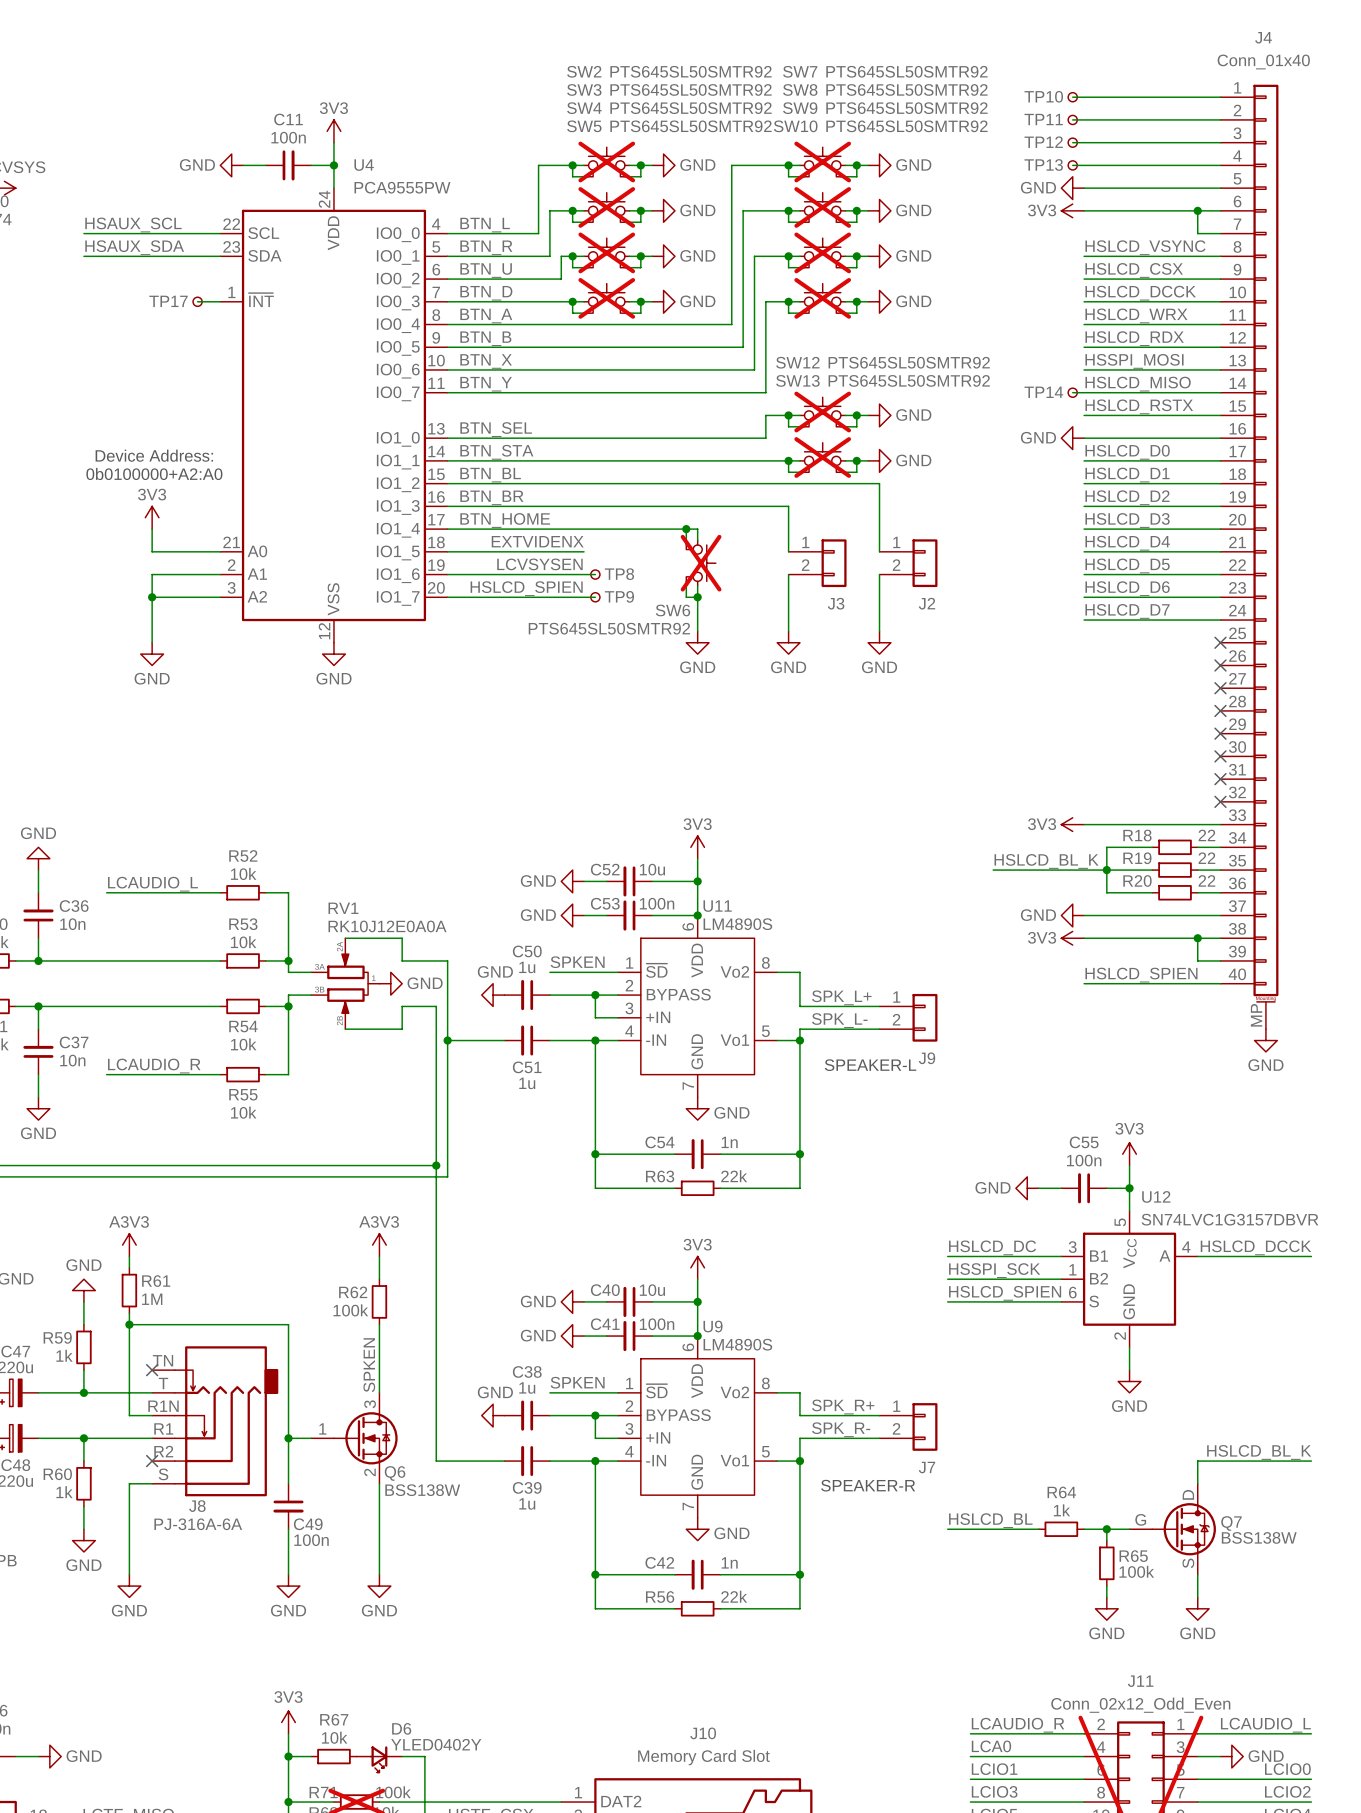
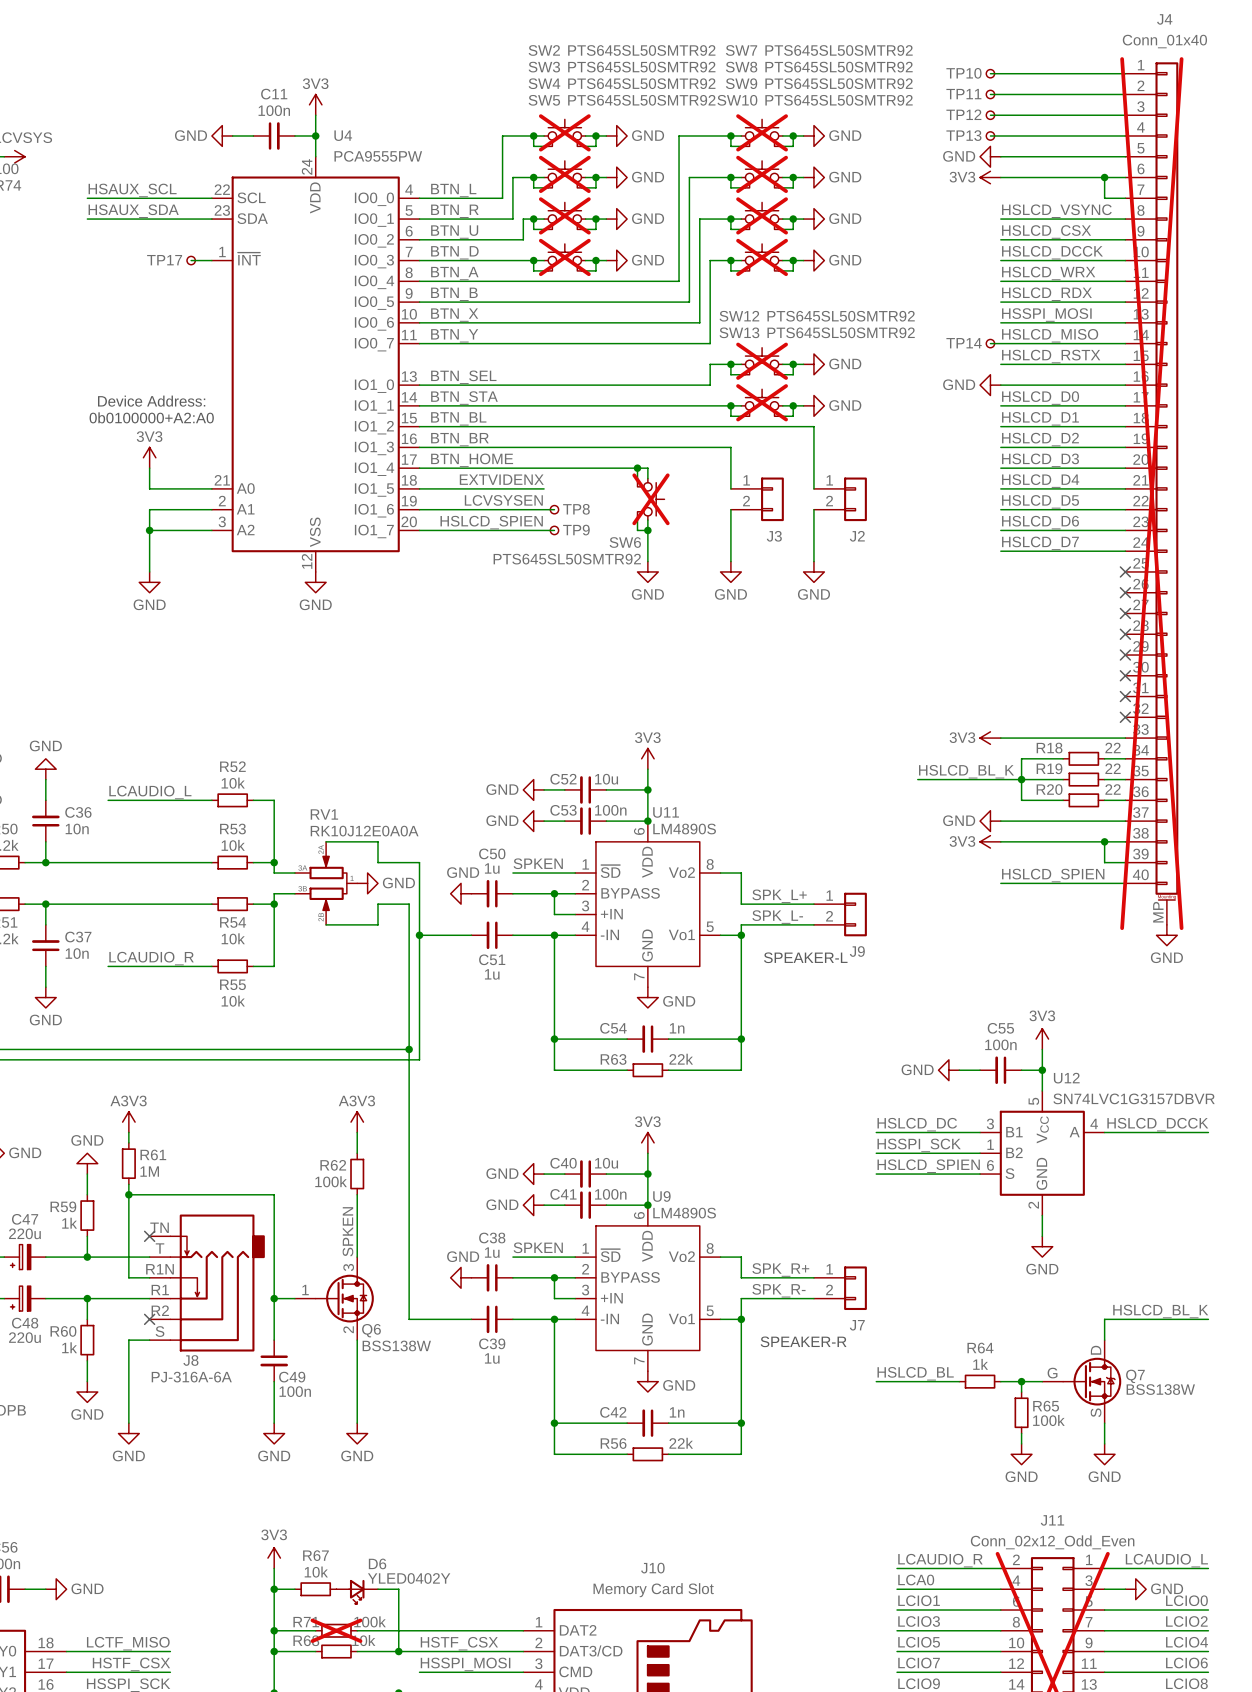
J4 do-not-place cross: none -> (1151, 493)

